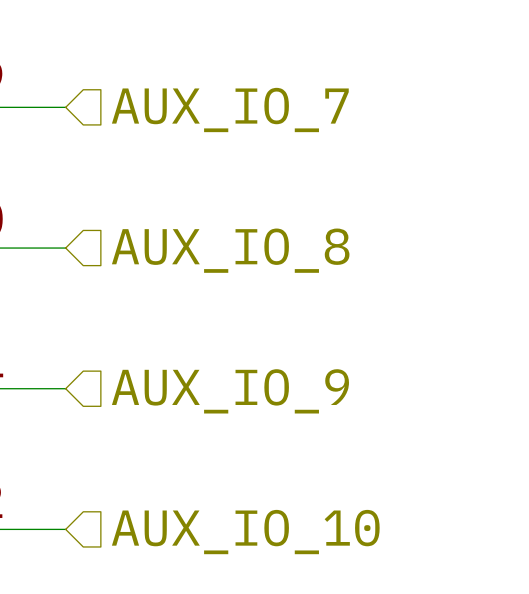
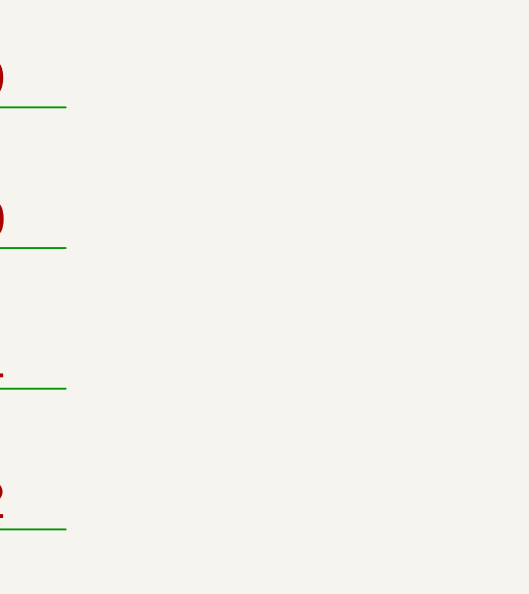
hierarchical label: AUX_IO_7 (230, 109) -> none
hierarchical label: AUX_IO_8 (230, 250) -> none
hierarchical label: AUX_IO_9 (230, 391) -> none
hierarchical label: AUX_IO_10 (245, 532) -> none

